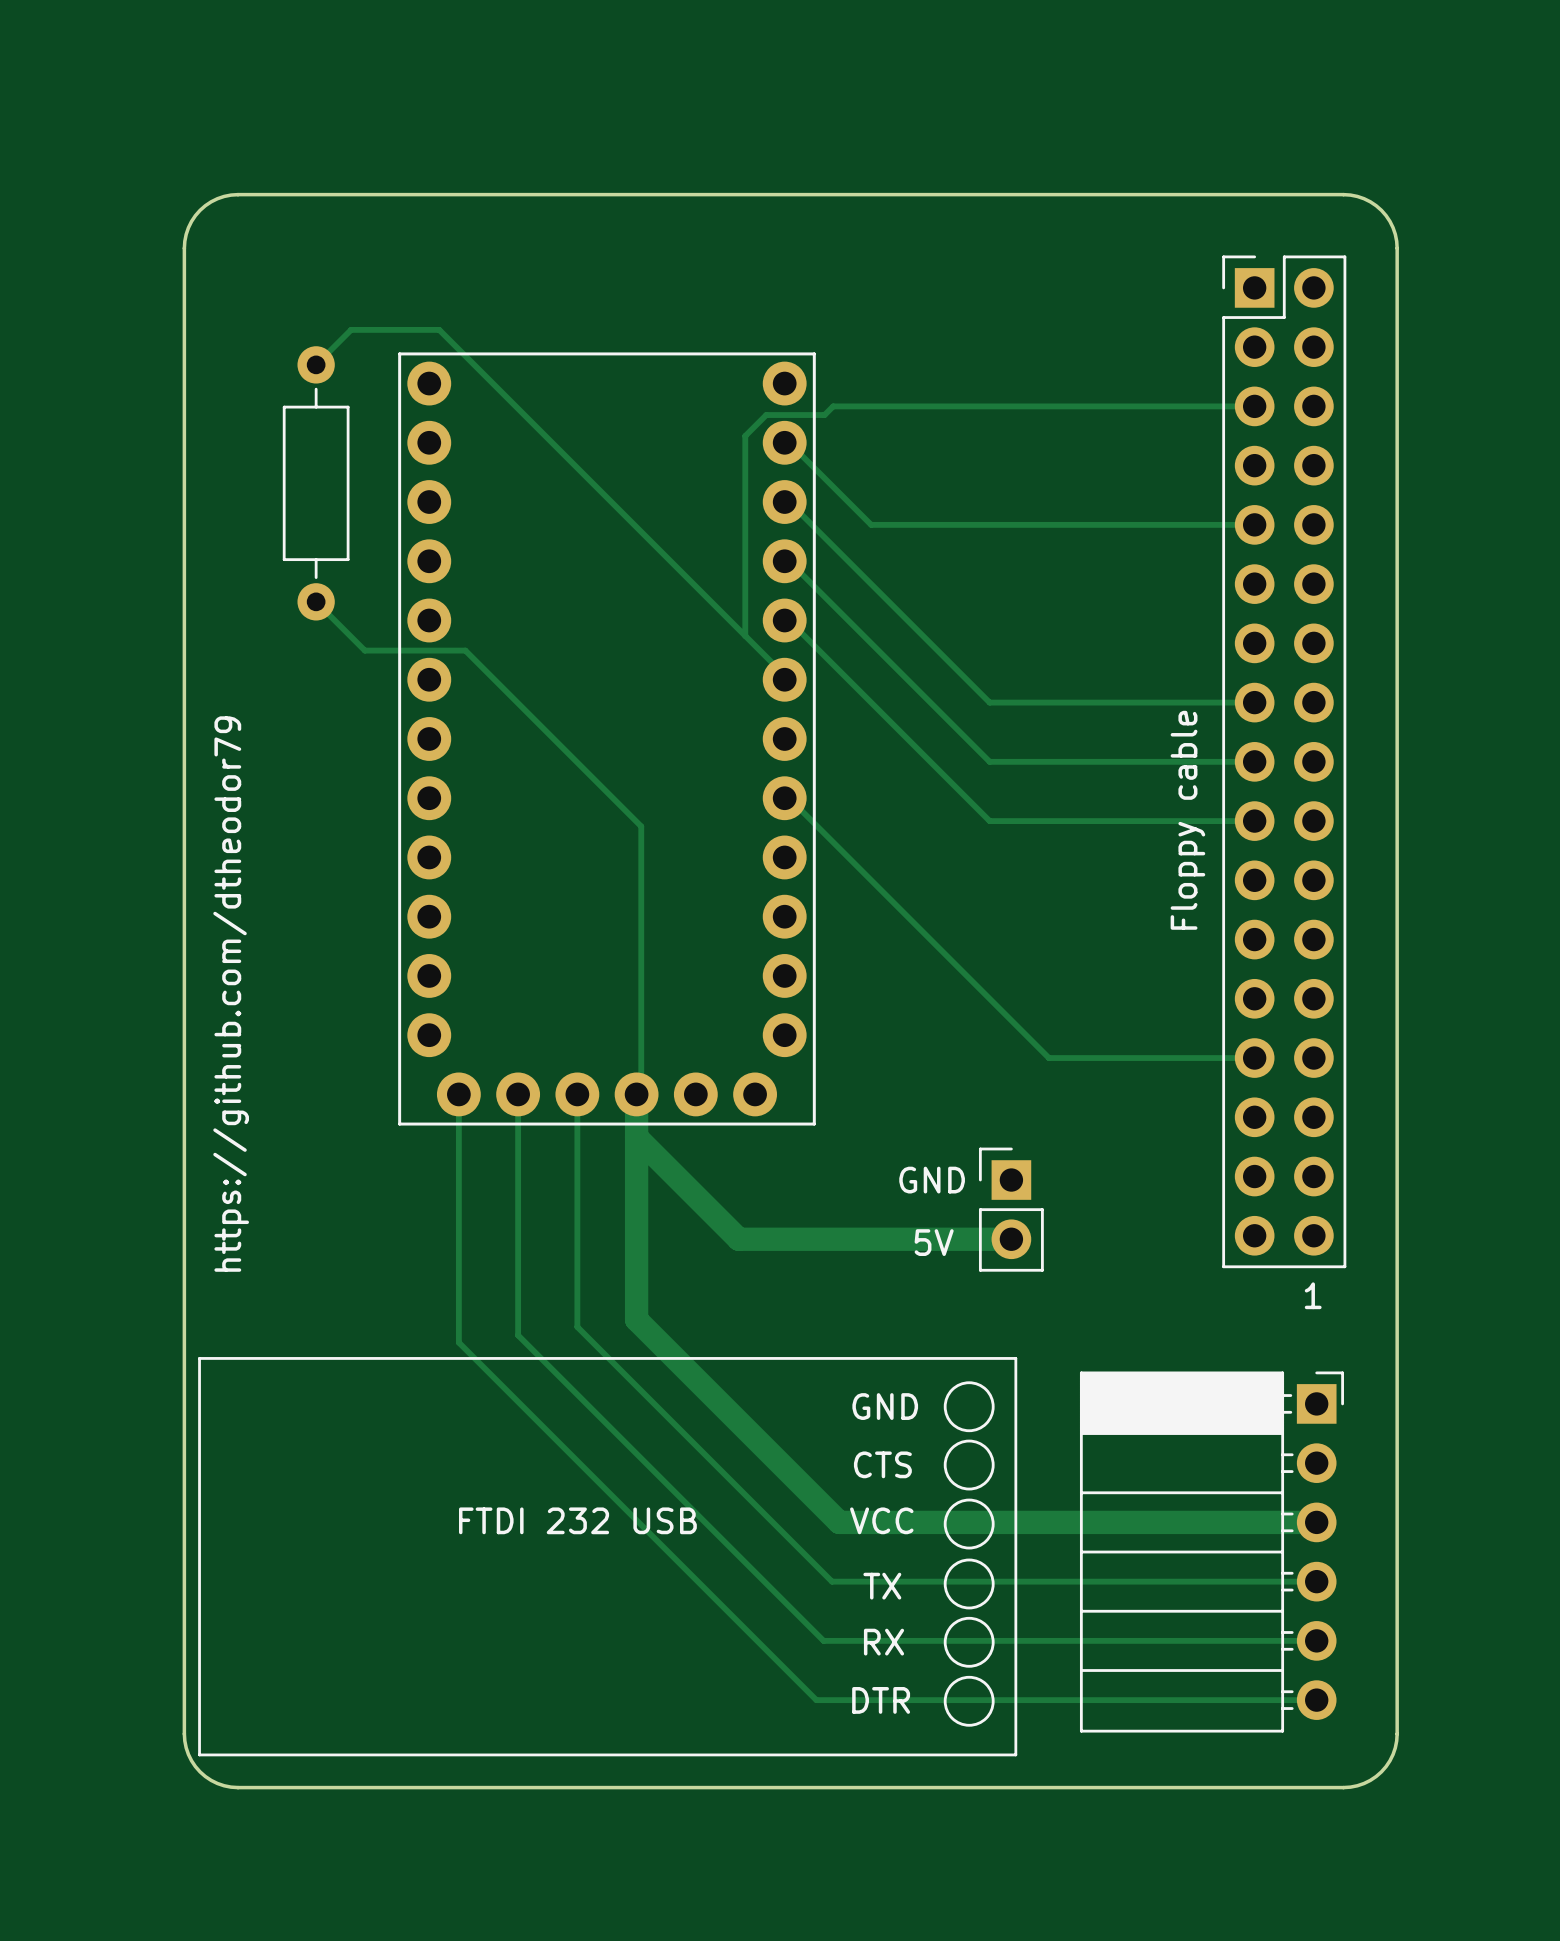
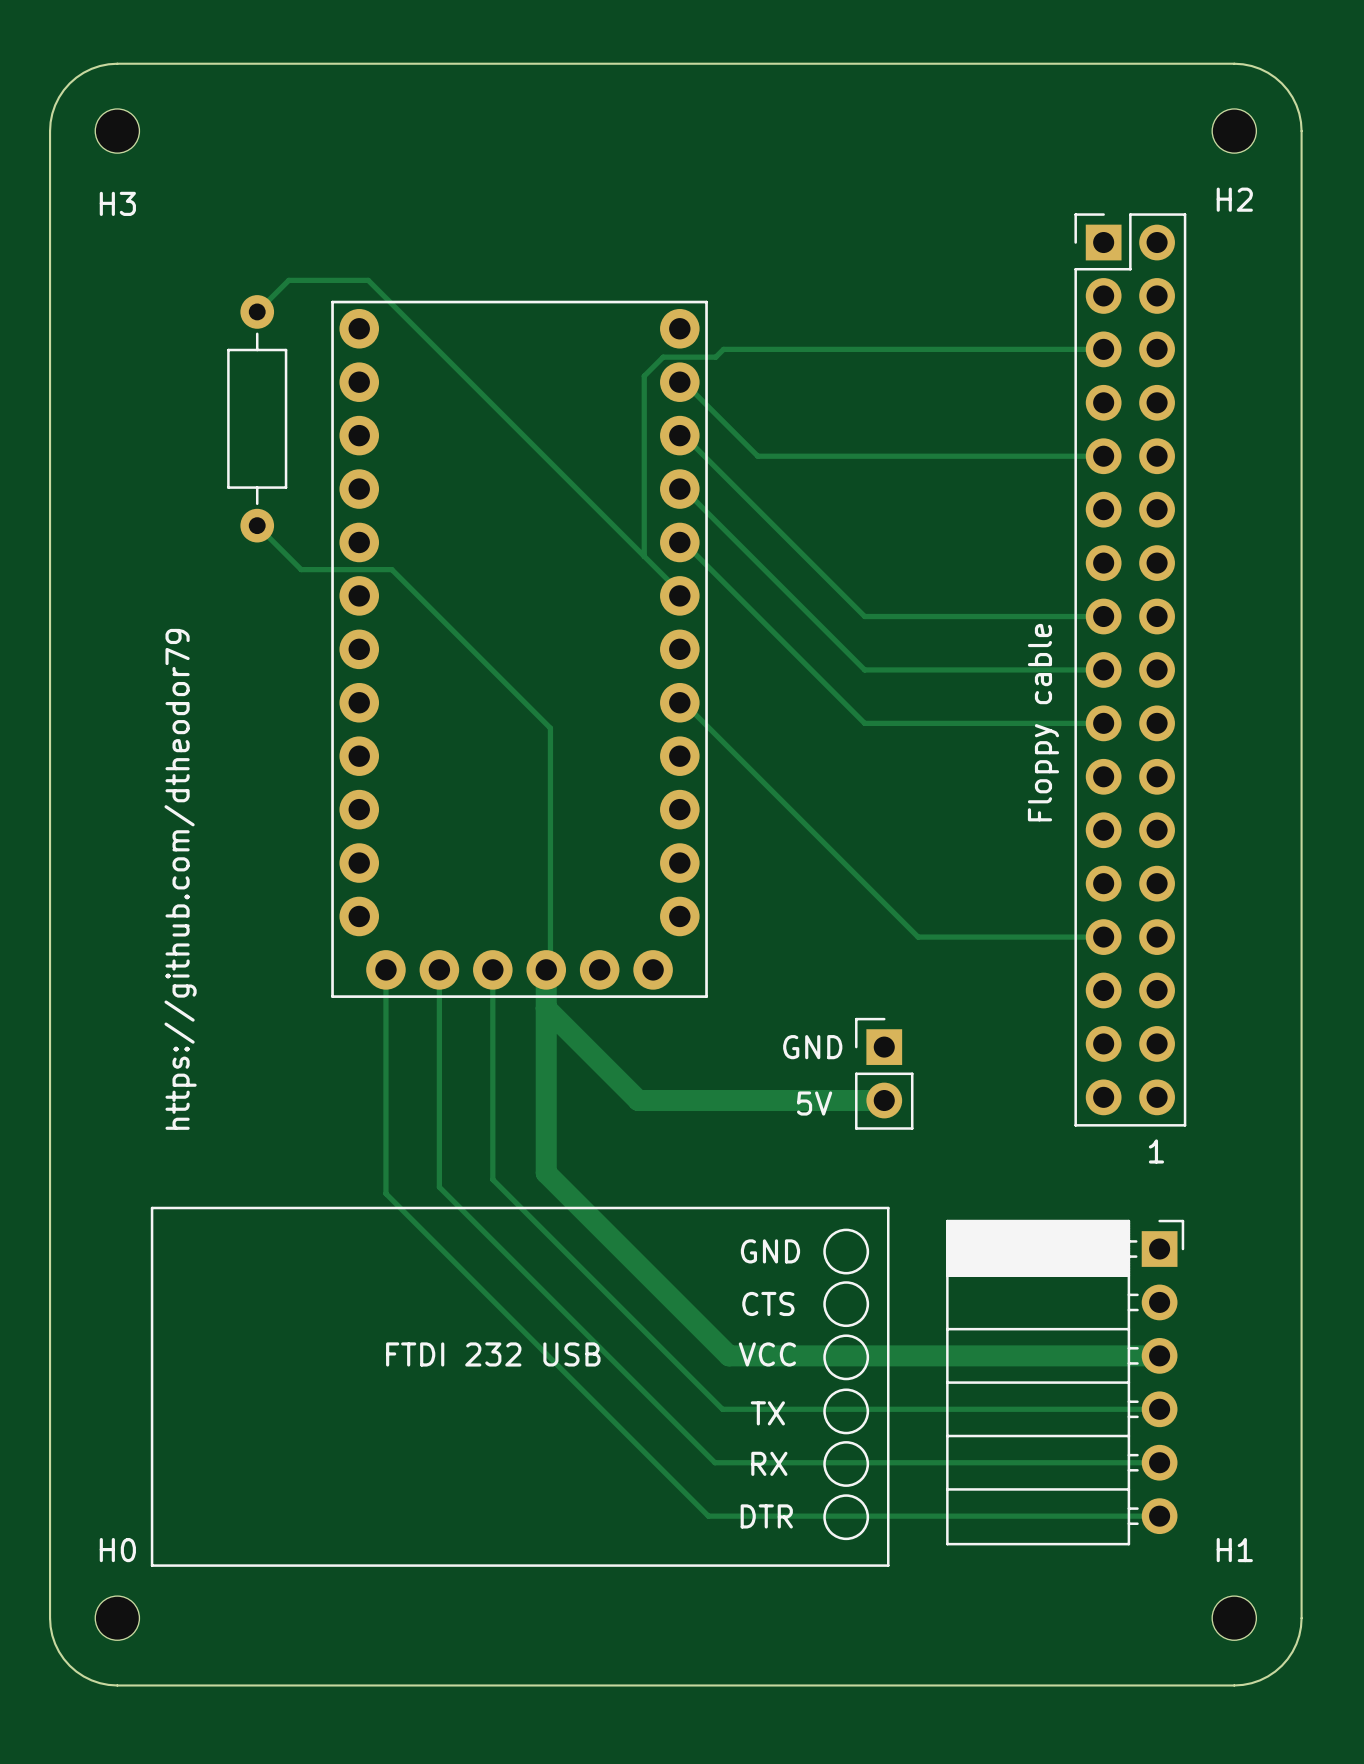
H3: none -> (117, 131)
H2: none -> (1234, 131)
board edge: (238, 194) (1343, 194) (1364, 198) (1376, 205) (1386, 215) (1395, 234) (1397, 248) (1397, 1733) (1393, 1754) (1386, 1766) (1376, 1776) (1357, 1785) (1343, 1787) (238, 1787) (217, 1783) (205, 1776) (195, 1766) (186, 1747) (184, 1733) (184, 248) (188, 227) (200, 210) (217, 198) (238, 194) -> (117, 63) (91, 68) (69, 83) (55, 105) (50, 131) (50, 1618) (55, 1643) (63, 1659) (76, 1671) (91, 1680) (117, 1685) (1234, 1685) (1260, 1680) (1275, 1671) (1287, 1659) (1296, 1643) (1301, 1618) (1301, 131) (1296, 105) (1287, 90) (1275, 77) (1260, 68) (1234, 63) (117, 63)
H0: none -> (117, 1618)
H1: none -> (1234, 1618)

